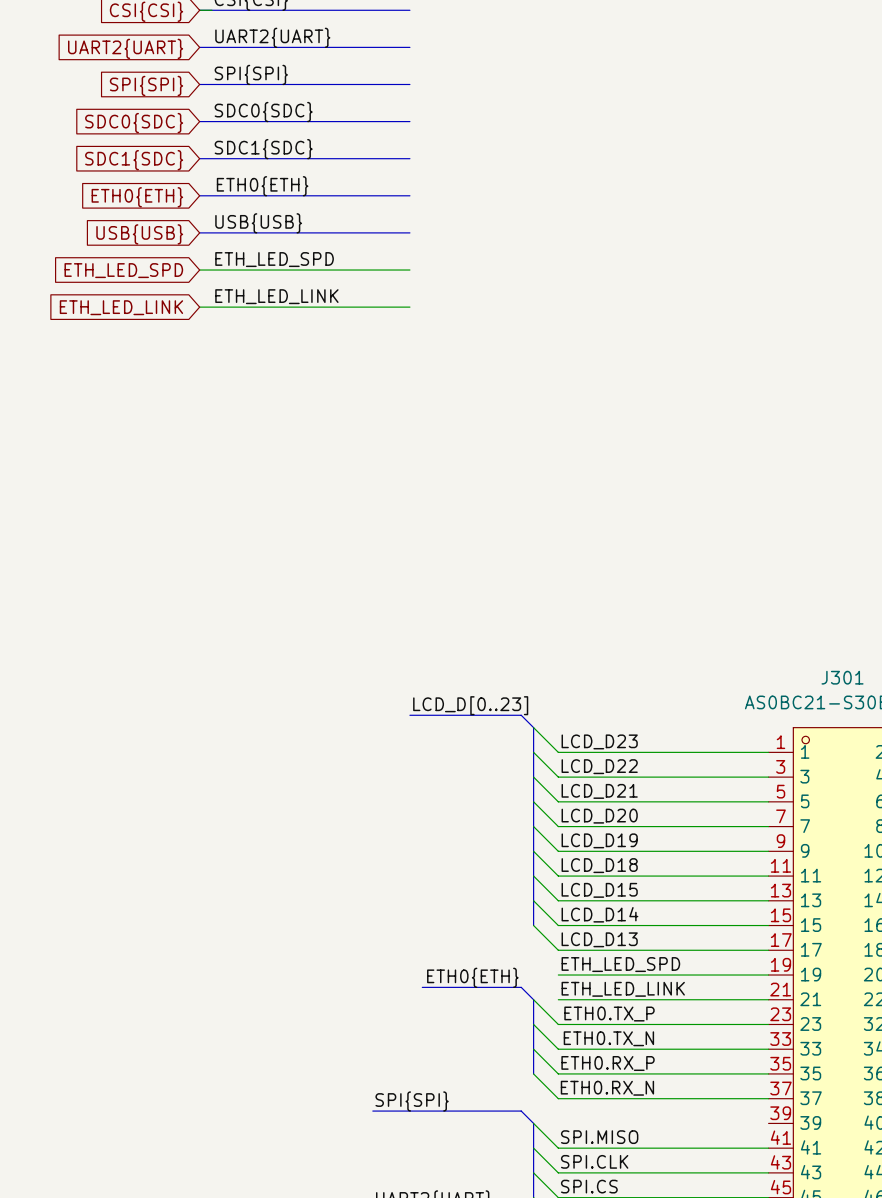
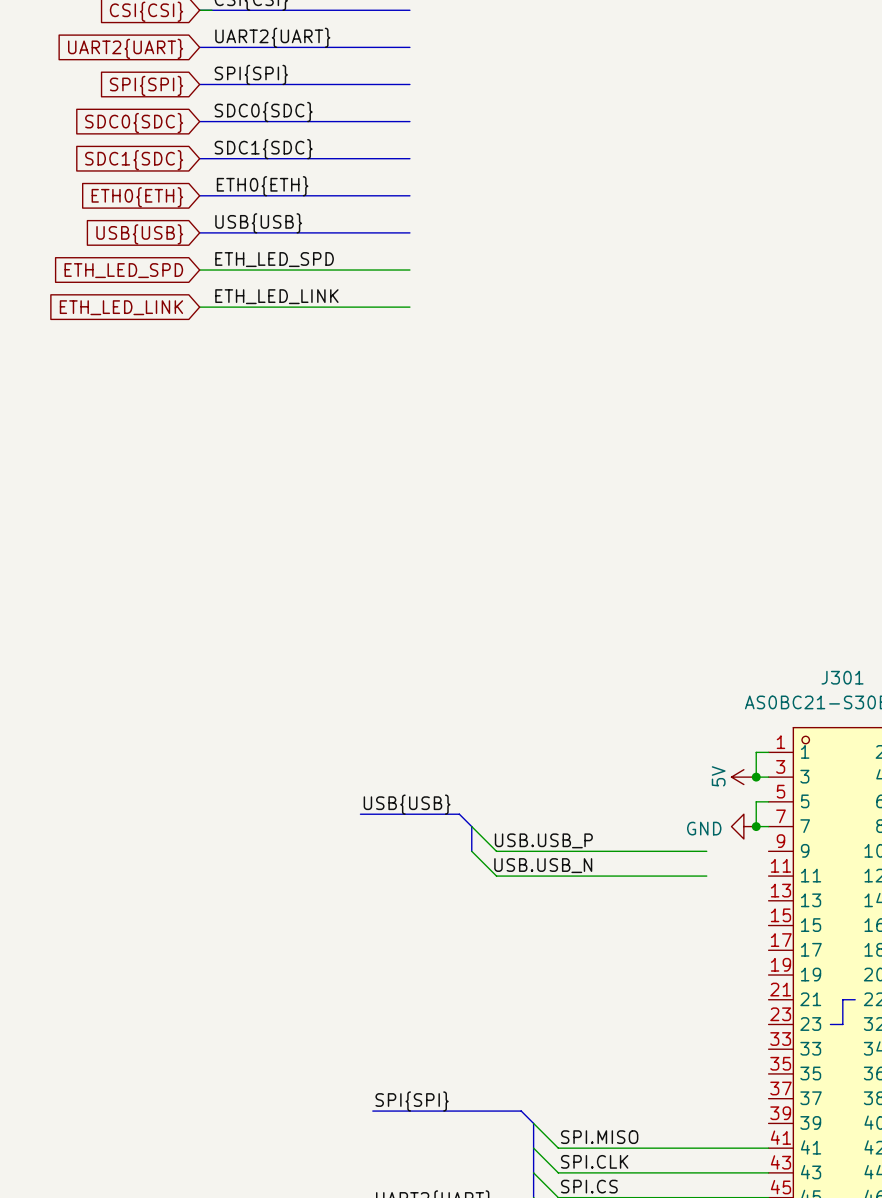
label: LCD_D[0..23] (470, 705) -> none
bus: (409, 715) (521, 715) (533, 727) (533, 925) -> none
wire: (533, 727) (558, 752) (756, 752) -> none
label: LCD_D23 (599, 741) -> none
wire: (533, 752) (558, 777) (756, 777) -> (756, 752) (756, 777)
label: LCD_D22 (599, 766) -> none
wire: (533, 777) (558, 801) (756, 801) -> none
power symbol: none -> 5V (743, 777)
junction: none -> (756, 777)
label: LCD_D21 (599, 791) -> none
wire: (533, 801) (558, 826) (756, 826) -> (756, 801) (756, 826)
label: none -> USB{USB} (407, 804)
bus: none -> (360, 814) (459, 814) (471, 826) (471, 851)
label: LCD_D20 (599, 816) -> none
wire: (533, 826) (558, 851) -> (471, 826) (496, 851) (558, 851)
power symbol: none -> GND (743, 826)
junction: none -> (756, 826)
label: none -> USB.USB_P (543, 840)
label: LCD_D19 (599, 840) -> none
wire: (533, 851) (558, 876) -> (471, 851) (496, 876) (558, 876)
wire: (706, 851) (768, 851) -> none
label: none -> USB.USB_N (543, 865)
label: LCD_D18 (599, 865) -> none
wire: (533, 876) (558, 900) (768, 900) -> none
wire: (706, 876) (768, 876) -> none
label: LCD_D15 (599, 890) -> none
wire: (533, 900) (558, 925) (768, 925) -> none
label: LCD_D14 (599, 914) -> none
wire: (533, 925) (558, 950) (768, 950) -> none
label: LCD_D13 (599, 939) -> none
label: ETH_LED_SPD (620, 964) -> none
wire: (558, 975) (768, 975) -> none
label: ETH0{ETH} (472, 977) -> none
bus: (422, 987) (521, 987) (533, 999) (533, 1073) -> none
label: ETH_LED_LINK (623, 989) -> none
wire: (533, 999) (558, 1024) (768, 1024) -> none
wire: (558, 999) (768, 999) -> none
line: none -> (855, 999) (842, 999) (842, 1024) (830, 1024)
label: ETH0.TX_P (609, 1014) -> none
wire: (533, 1024) (558, 1049) (768, 1049) -> none
label: ETH0.TX_N (608, 1038) -> none
wire: (533, 1049) (558, 1073) (768, 1073) -> none
label: ETH0.RX_P (608, 1063) -> none
wire: (533, 1073) (558, 1098) (768, 1098) -> none
label: ETH0.RX_N (607, 1088) -> none

